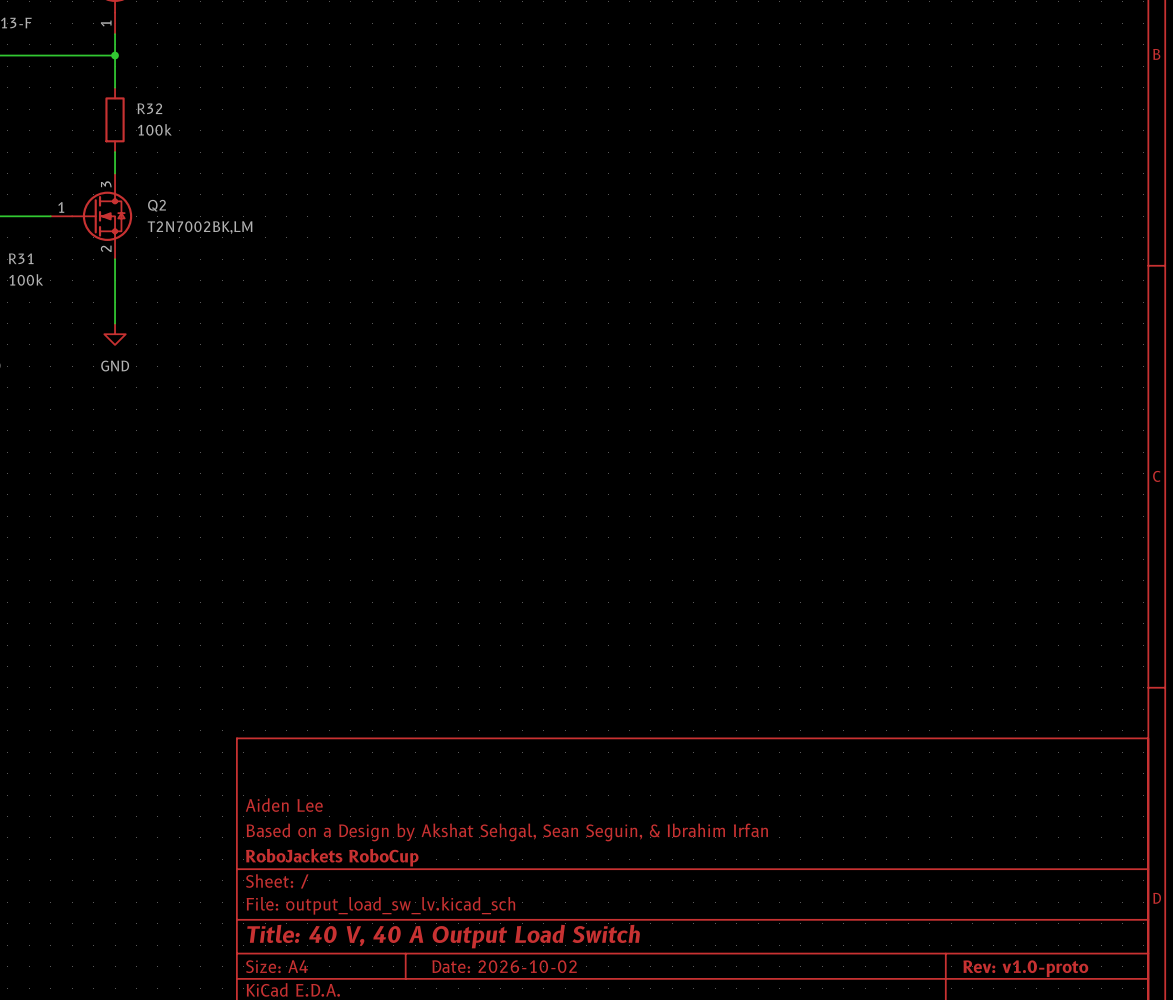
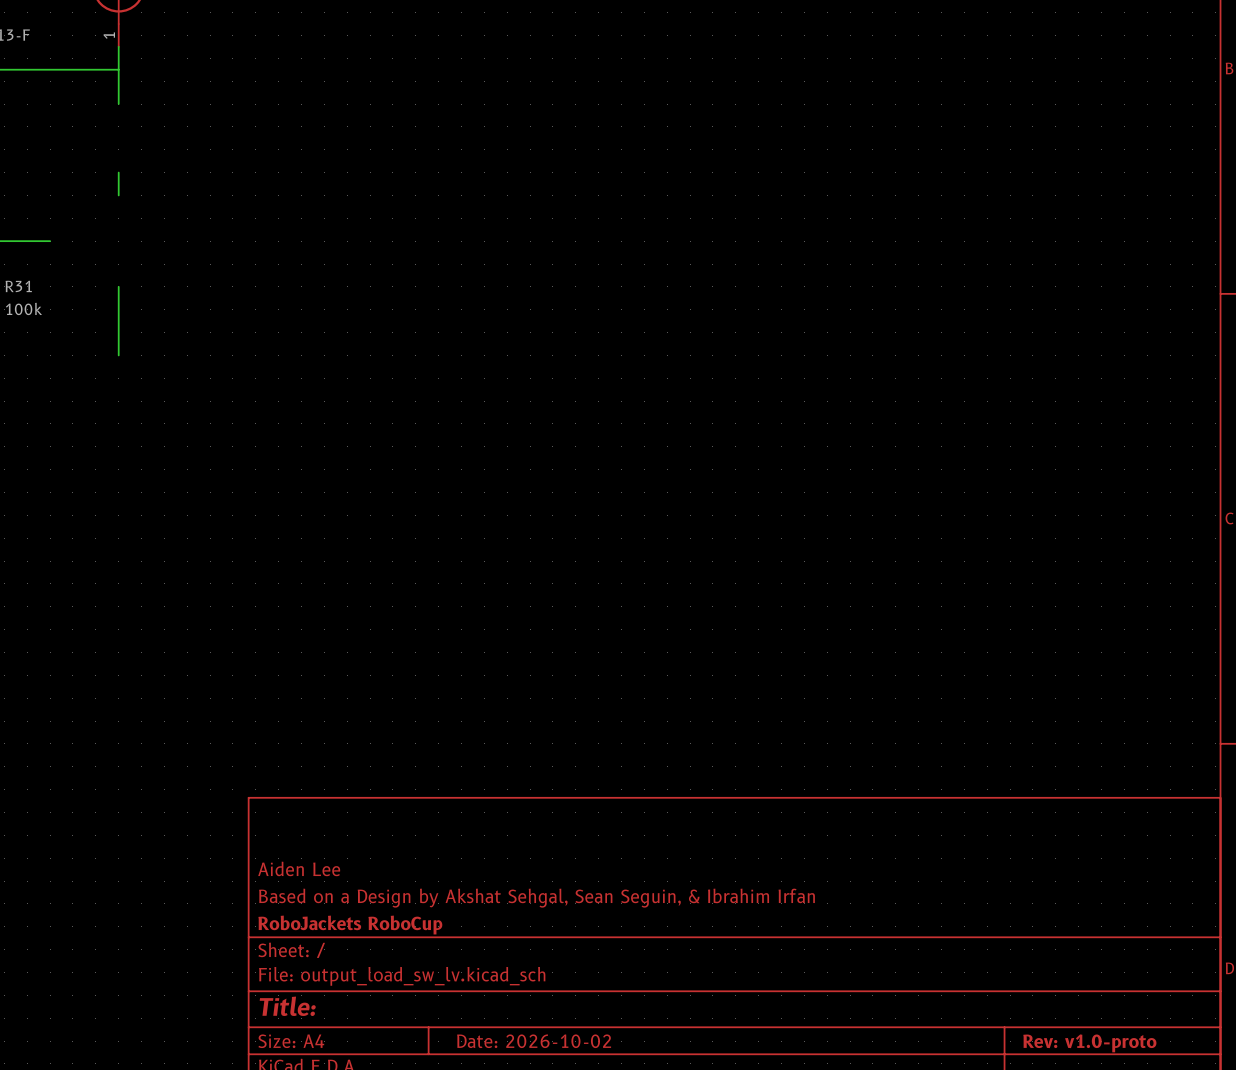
junction: (115, 55) -> none
R32: 100k (115, 119) -> none
Q2: T2N7002BK,LM (91, 216) -> none
power symbol: GND (115, 334) -> none
title block: Title: 40 V, 40 A Output Load Switch (443, 936) -> Title: (287, 1006)

